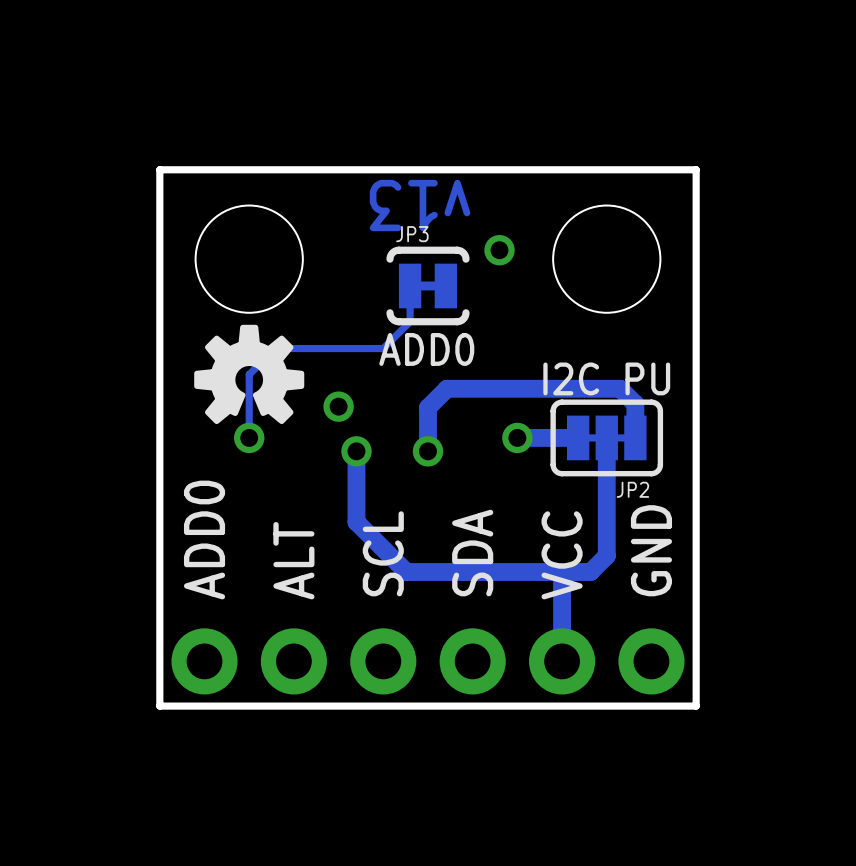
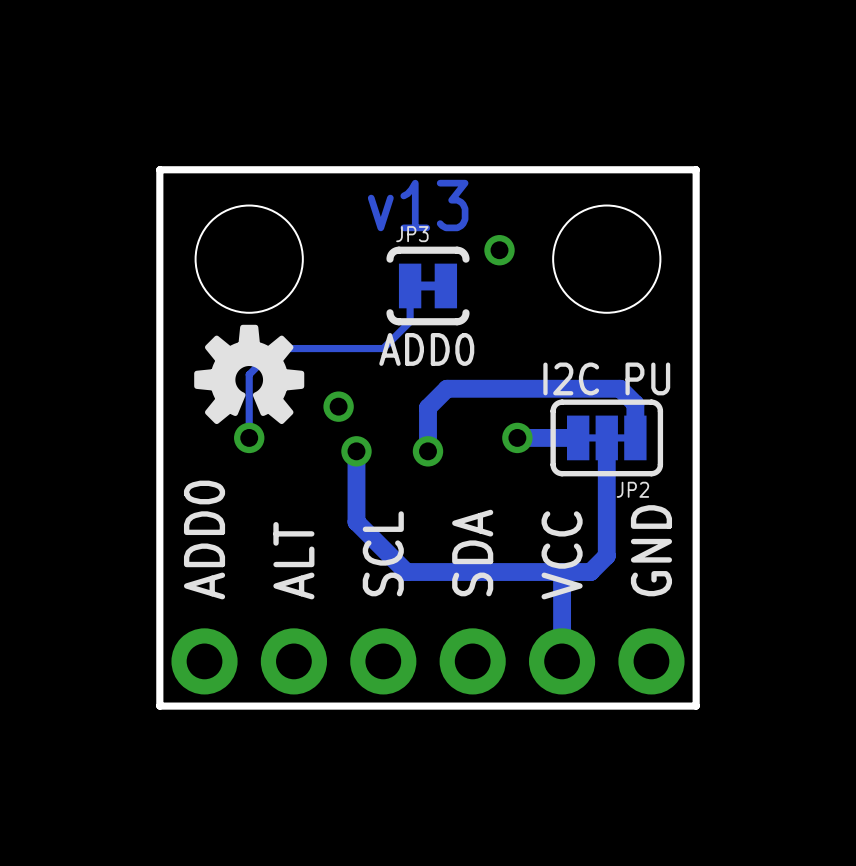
text rotation: 0° (420, 205) -> 180° (418, 205)

